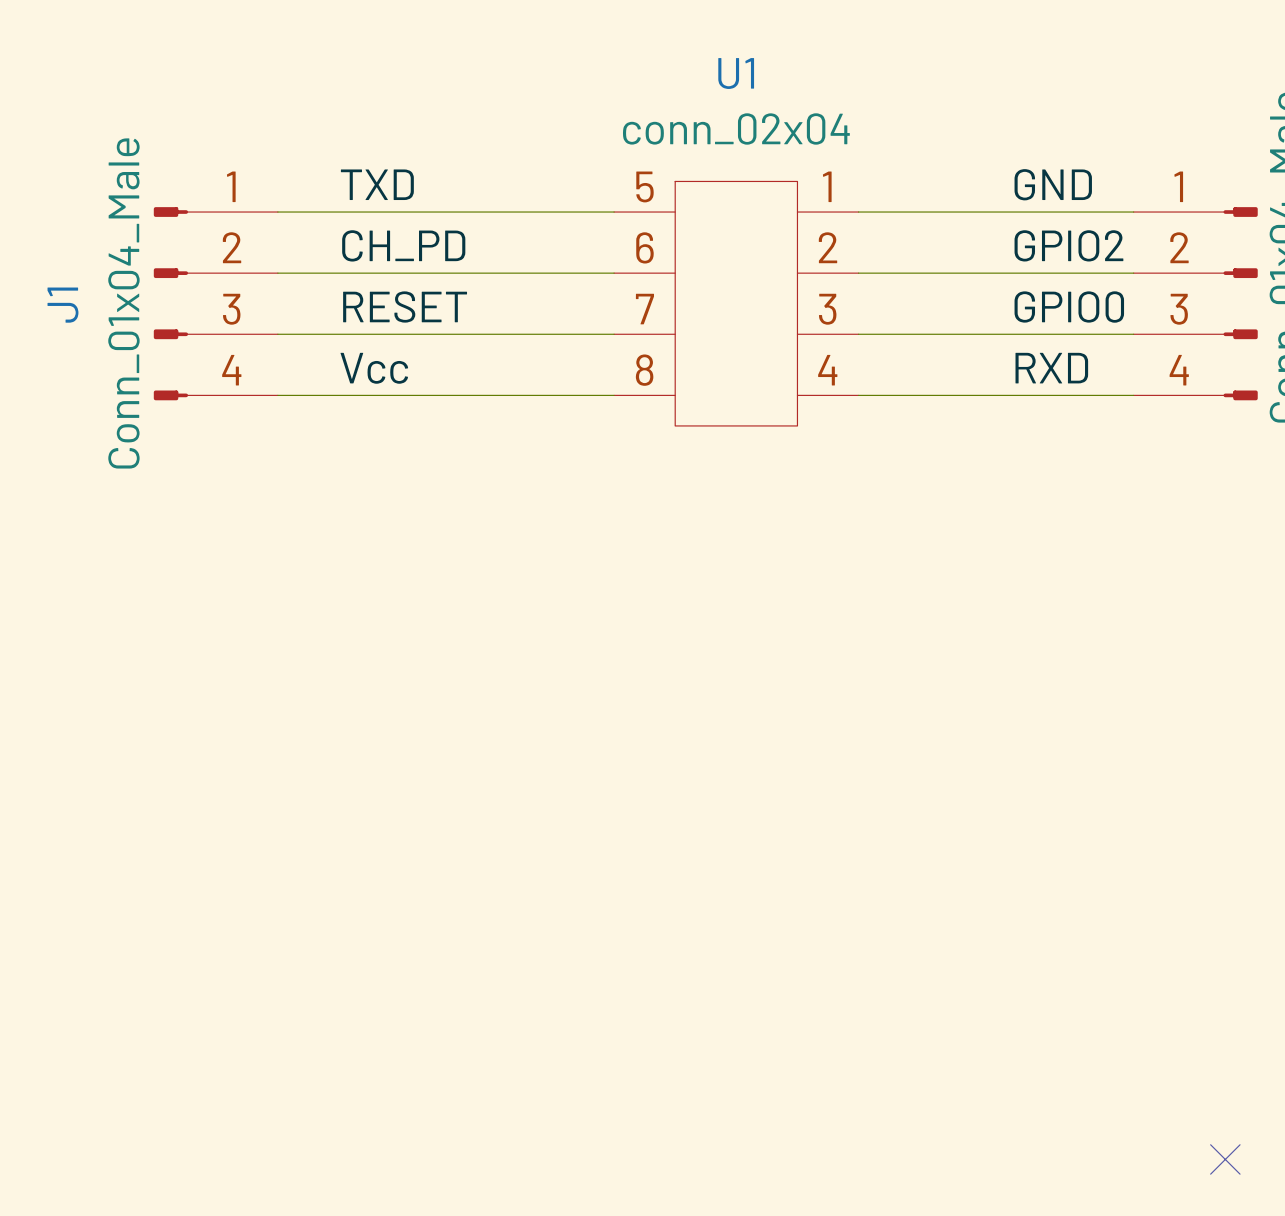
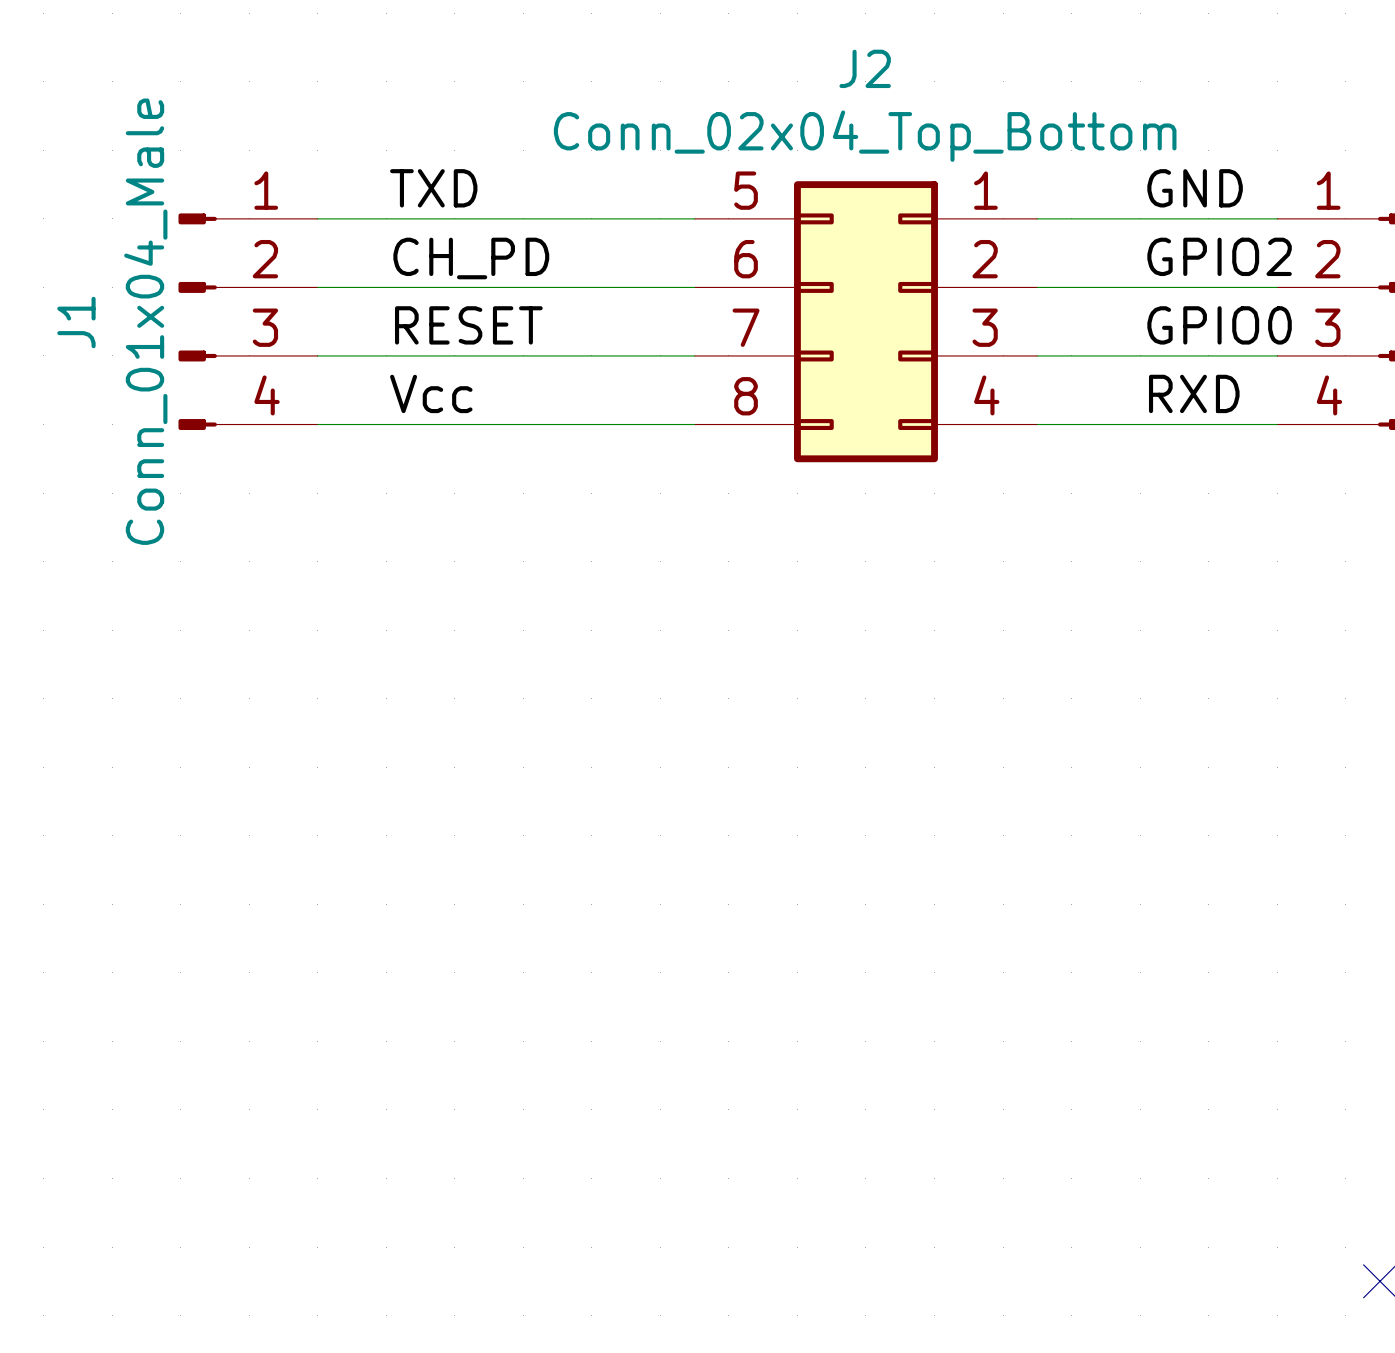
U1: conn_02x04 (736, 303) -> none
J2: none -> Conn_02x04_Top_Bottom (865, 321)

